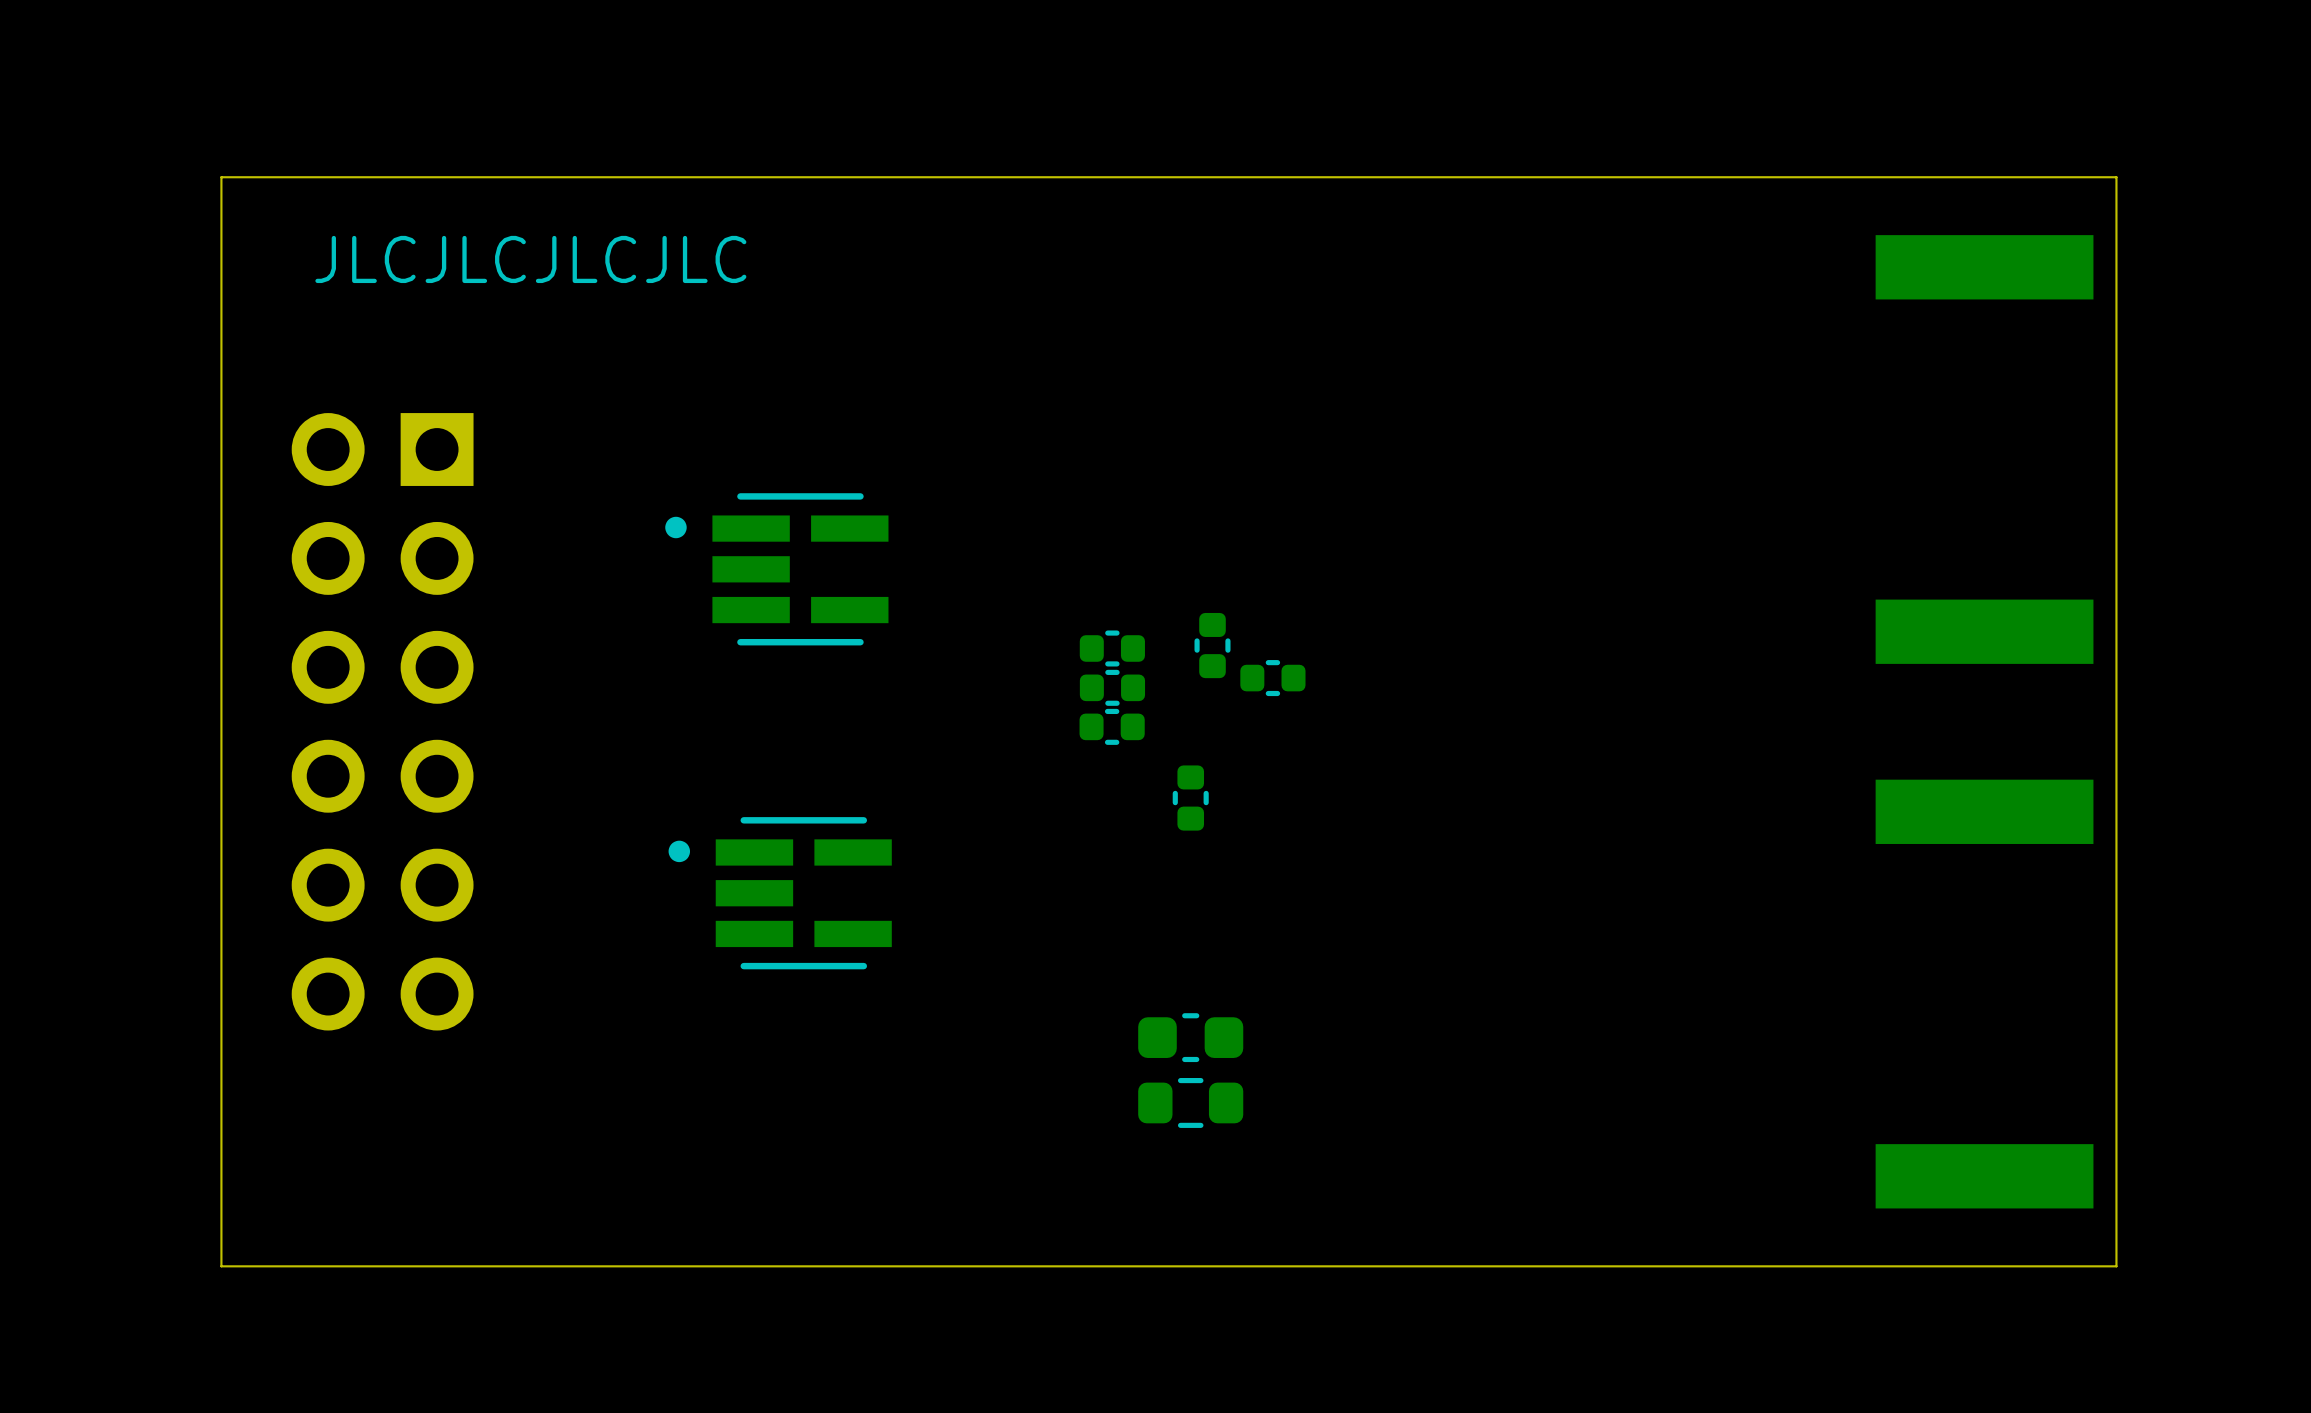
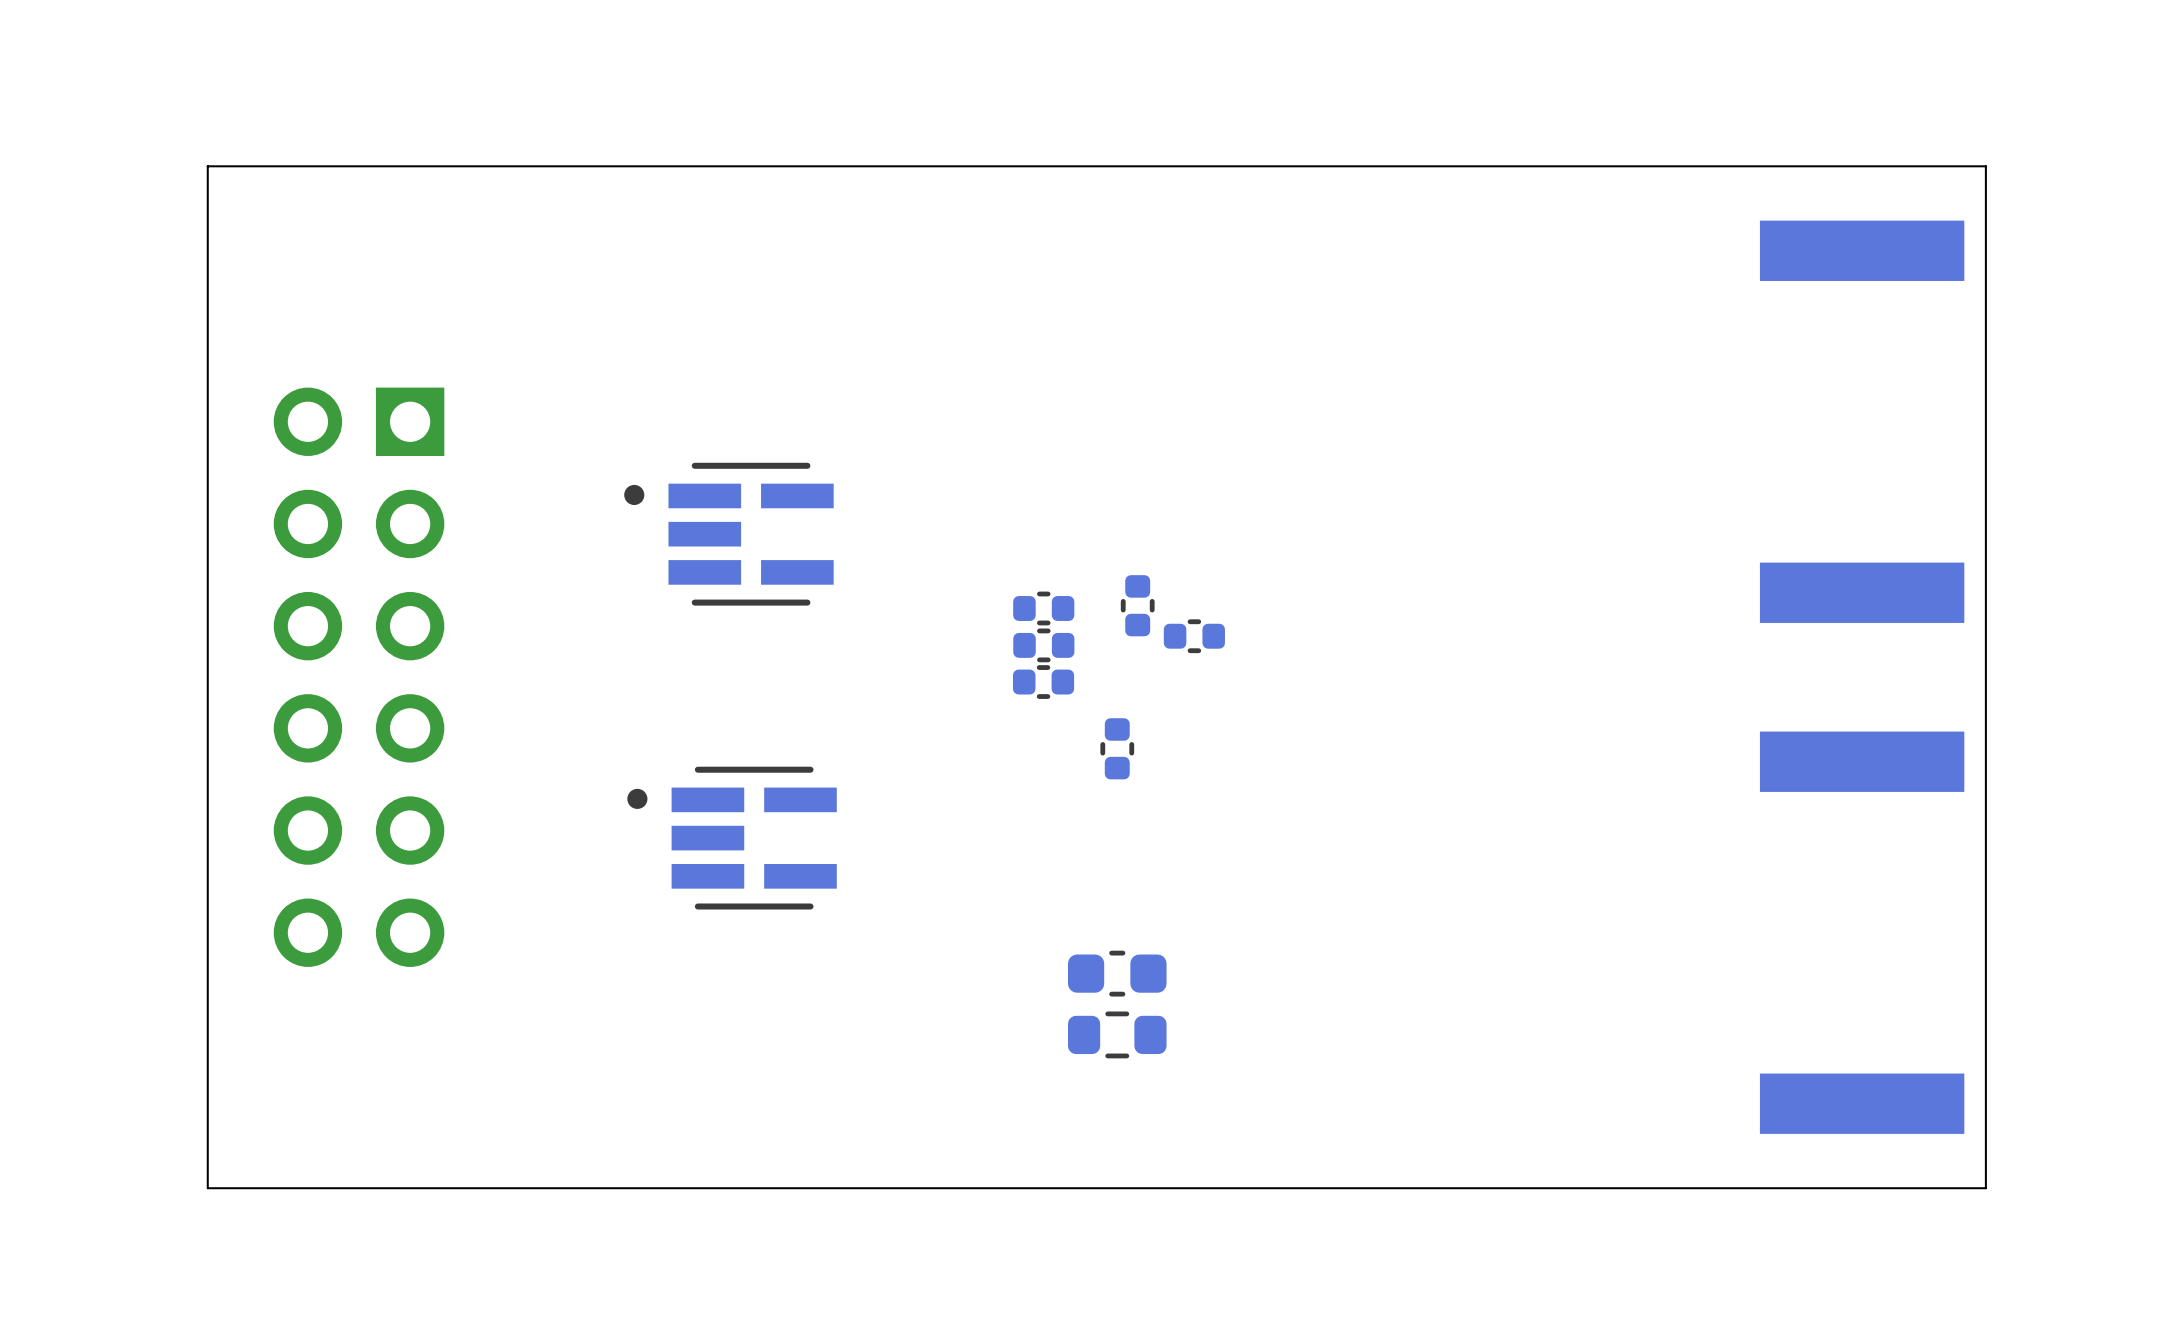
text: JLCJLCJLCJLC (530, 259) -> none

